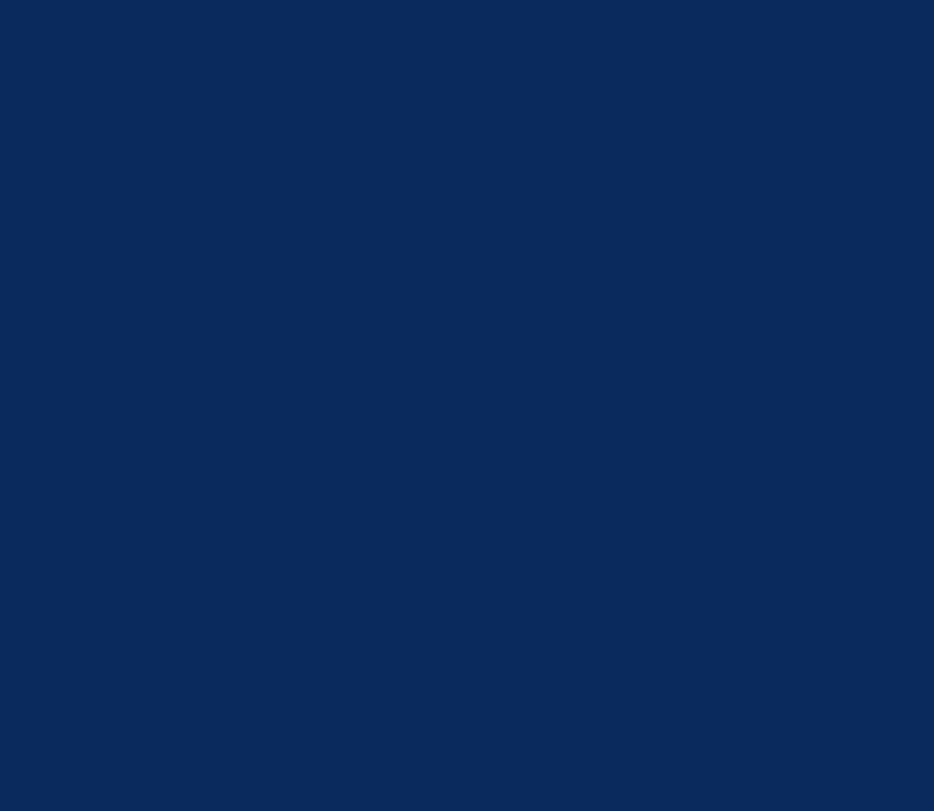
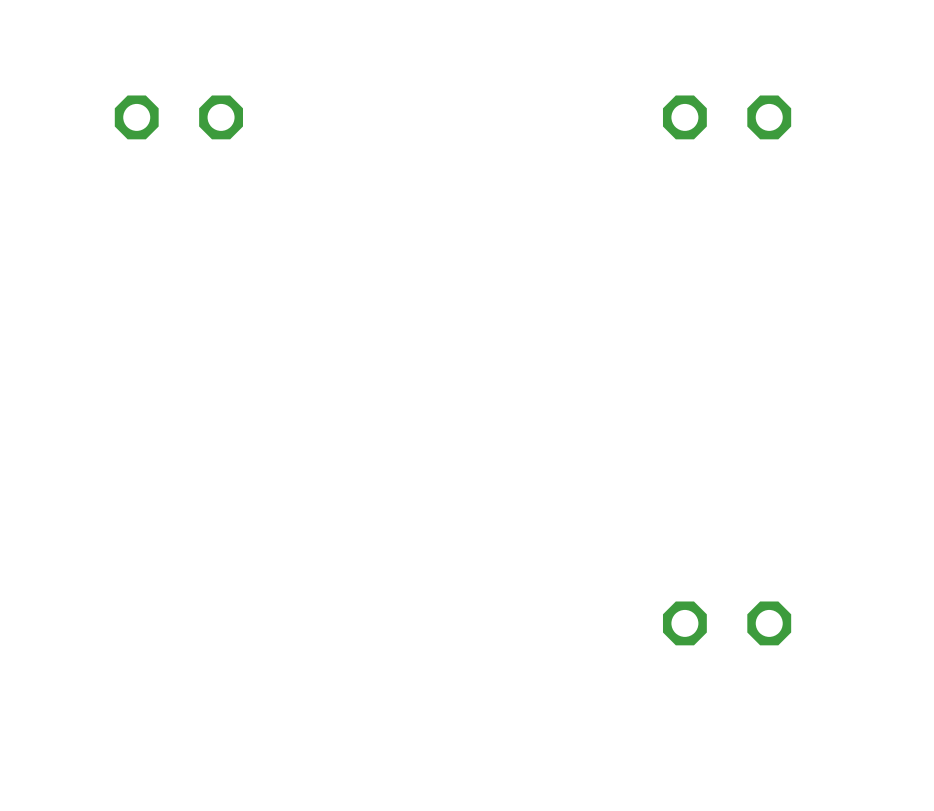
part: none -> (178, 117)
part: none -> (727, 117)
part: none -> (727, 623)

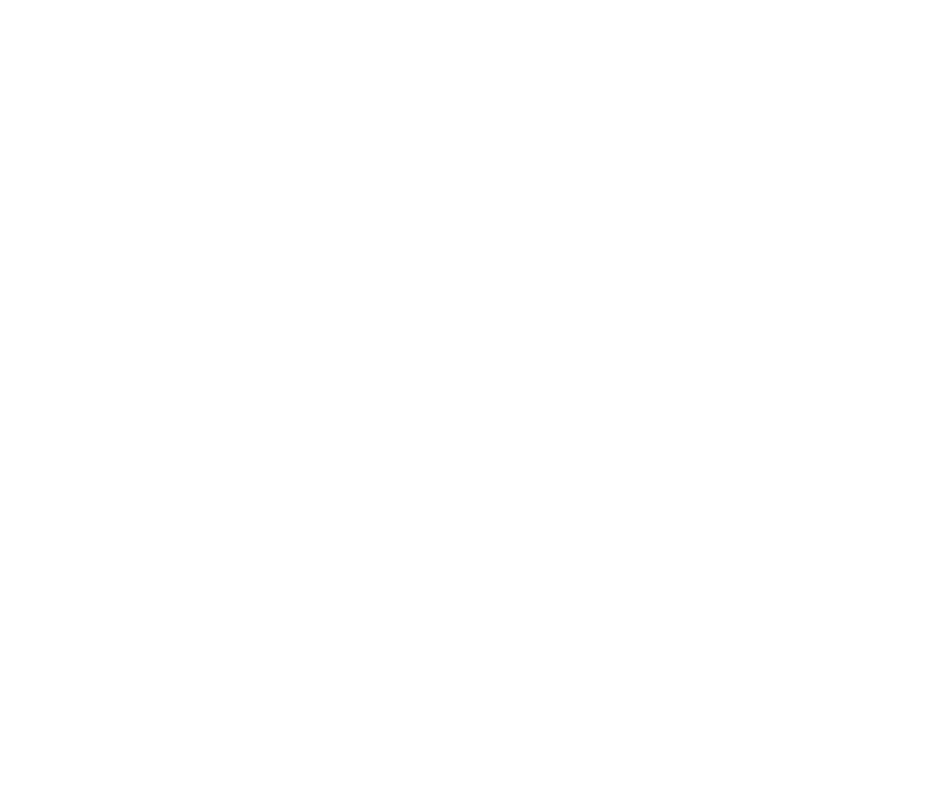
part: (178, 117) -> none
part: (727, 117) -> none
part: (727, 623) -> none

